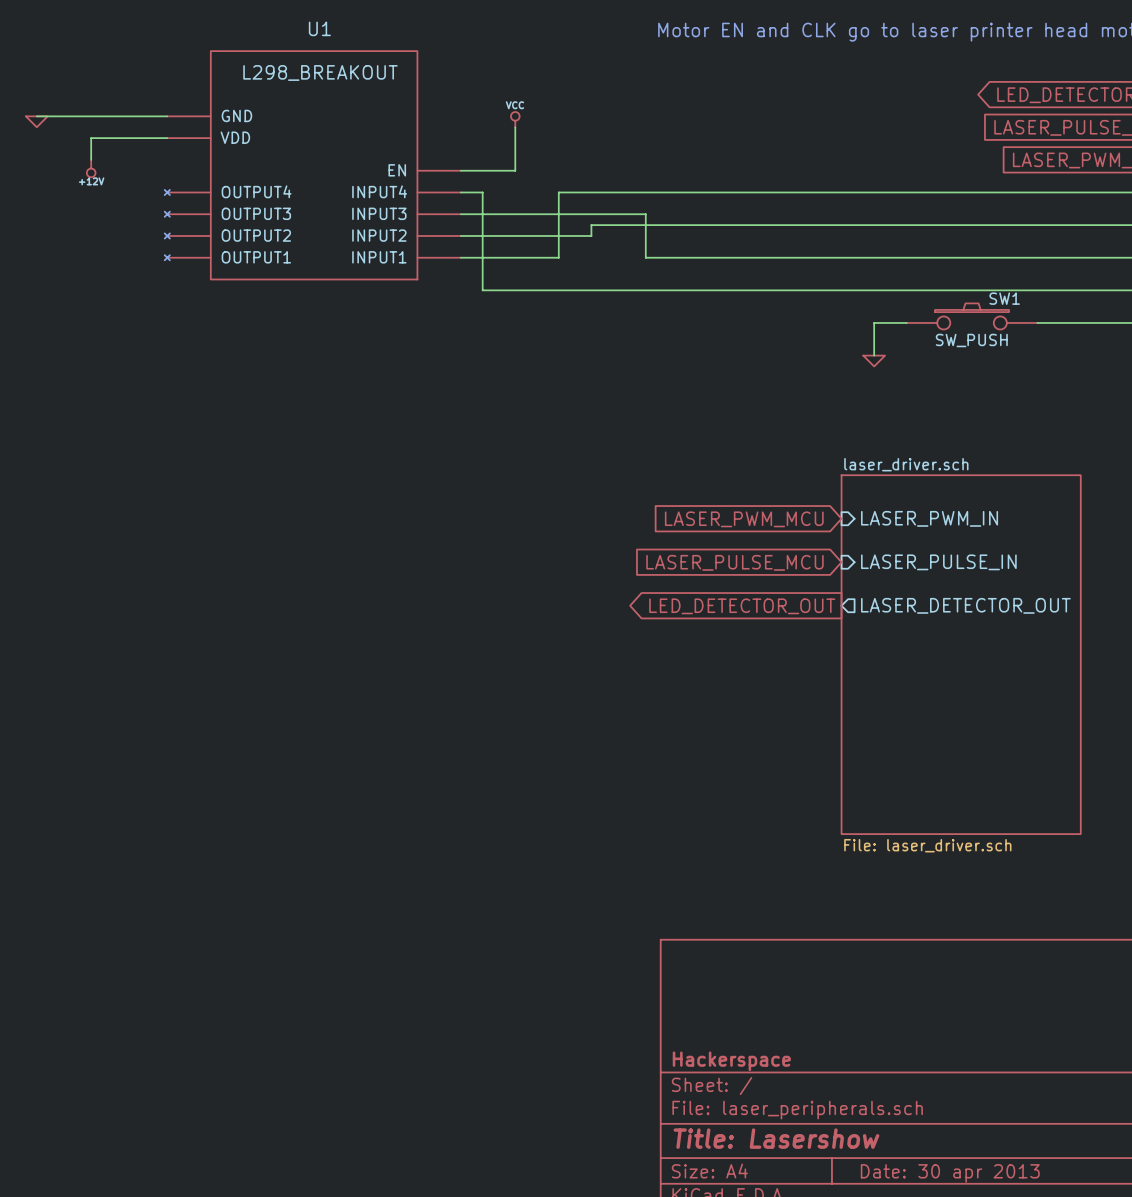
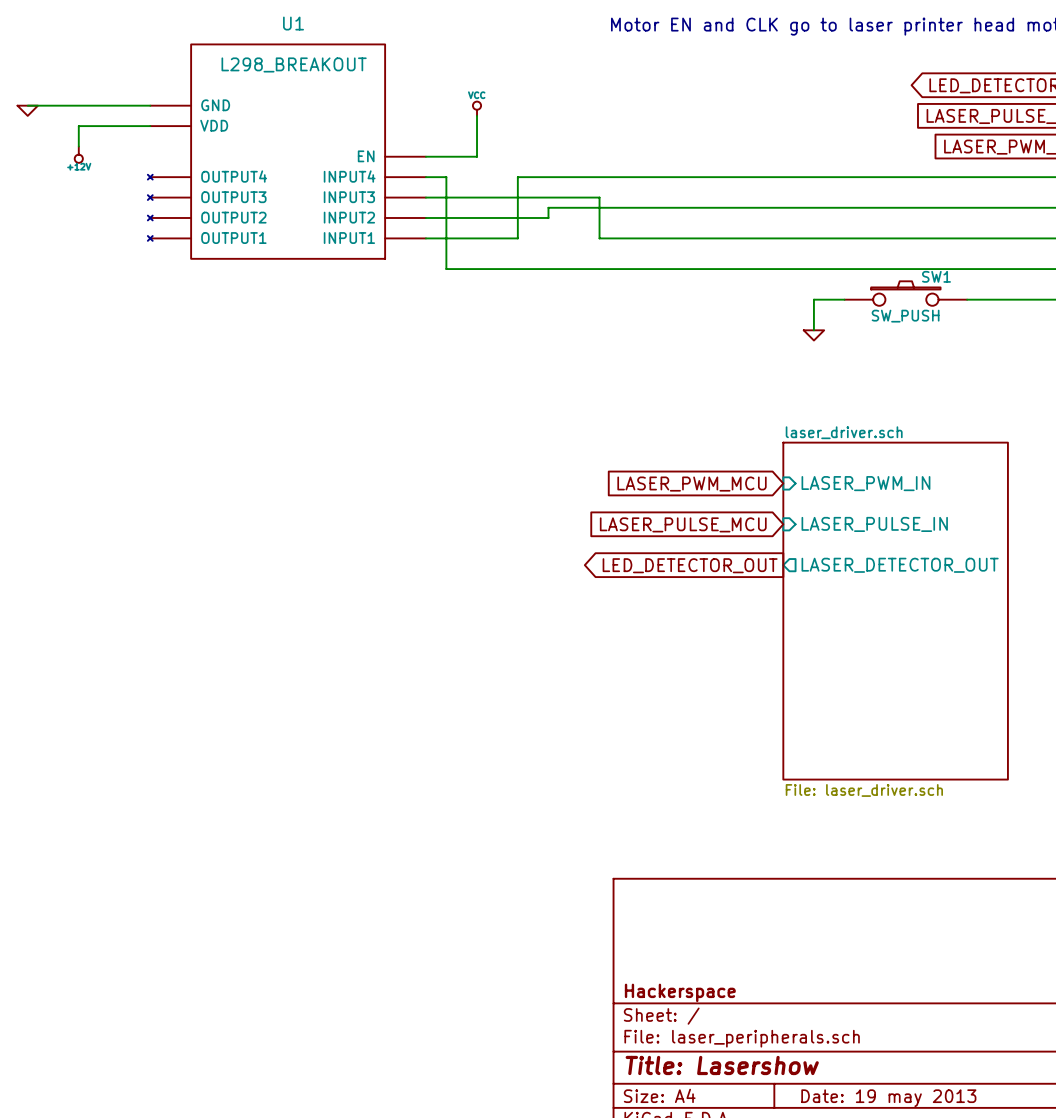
title block: Date: 30 apr 2013 (950, 1173) -> Date: 19 may 2013 (888, 1098)

